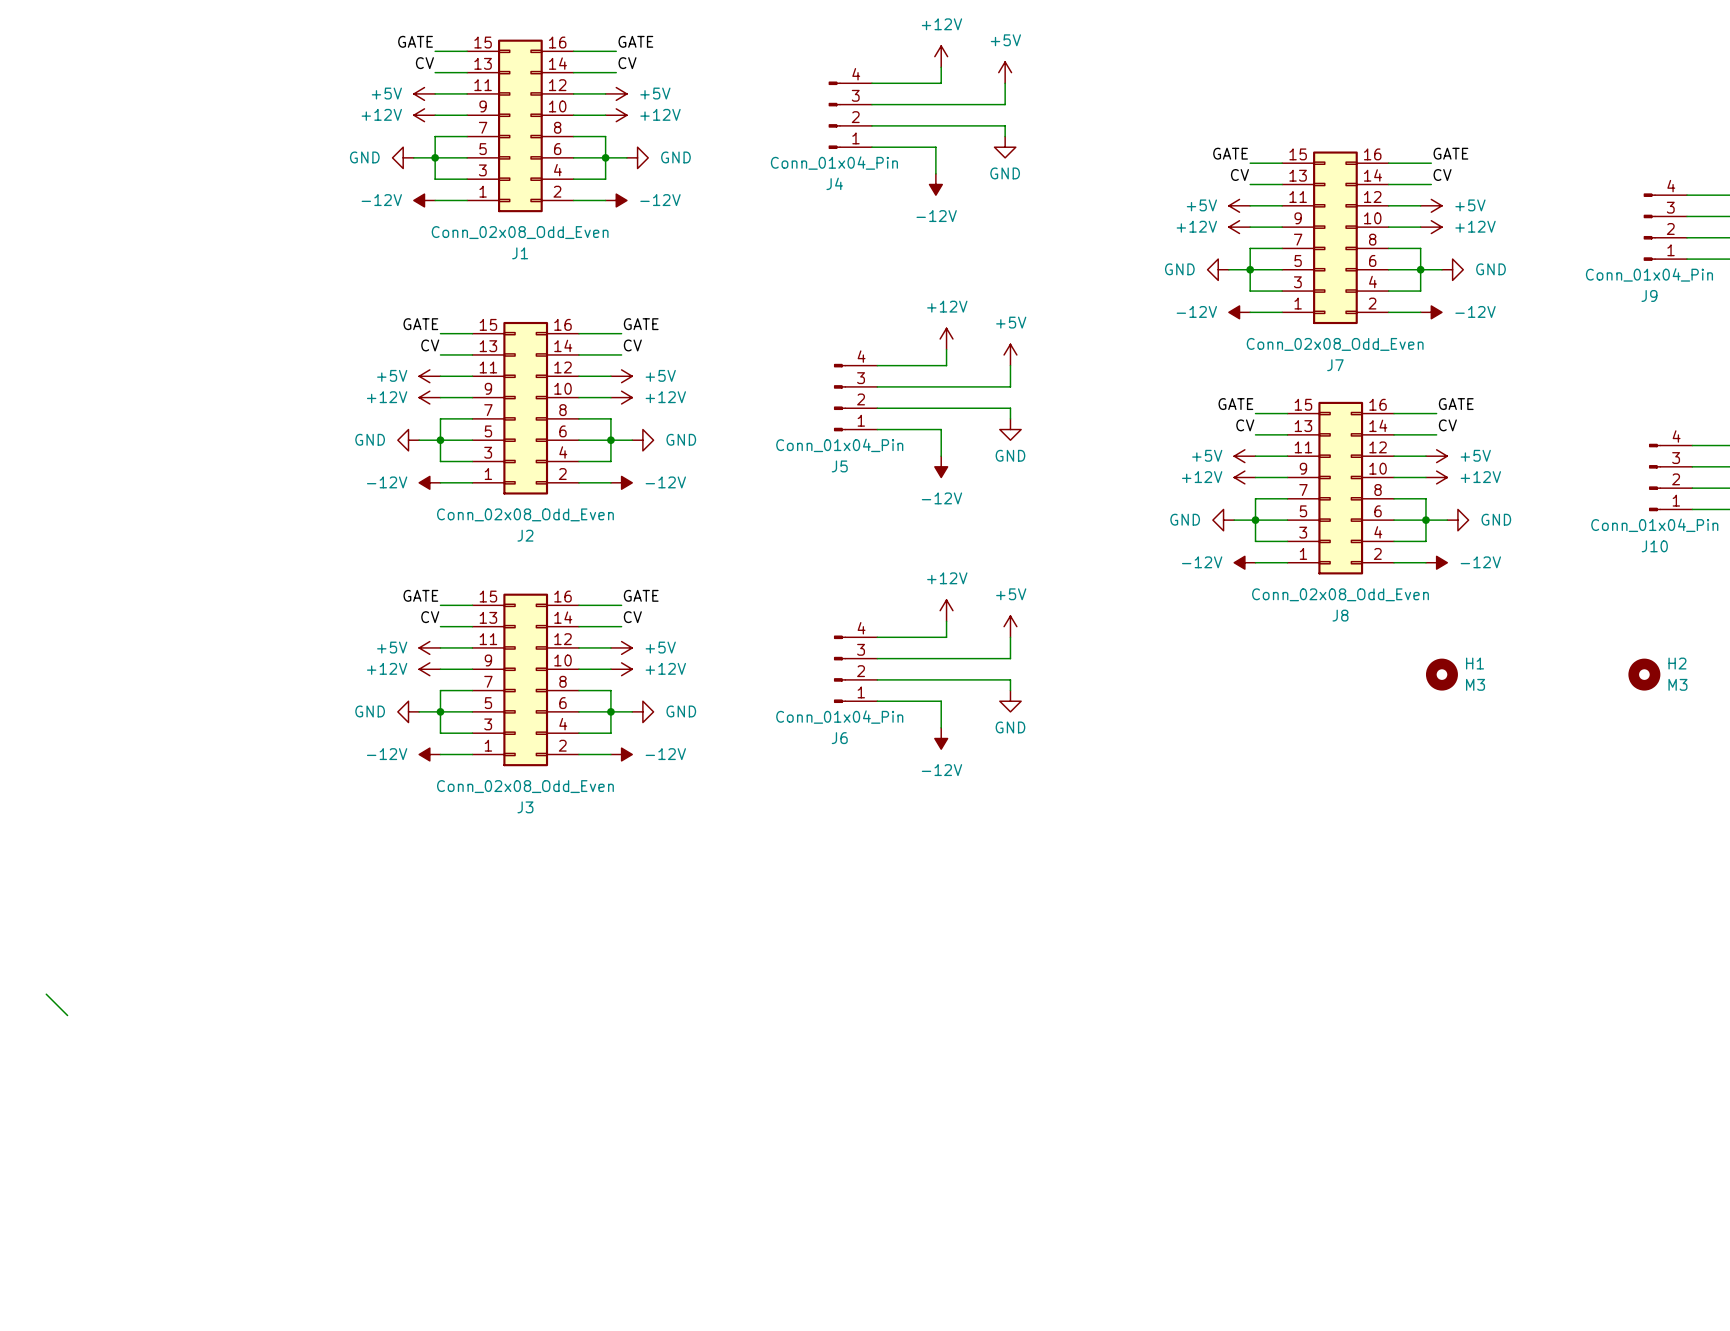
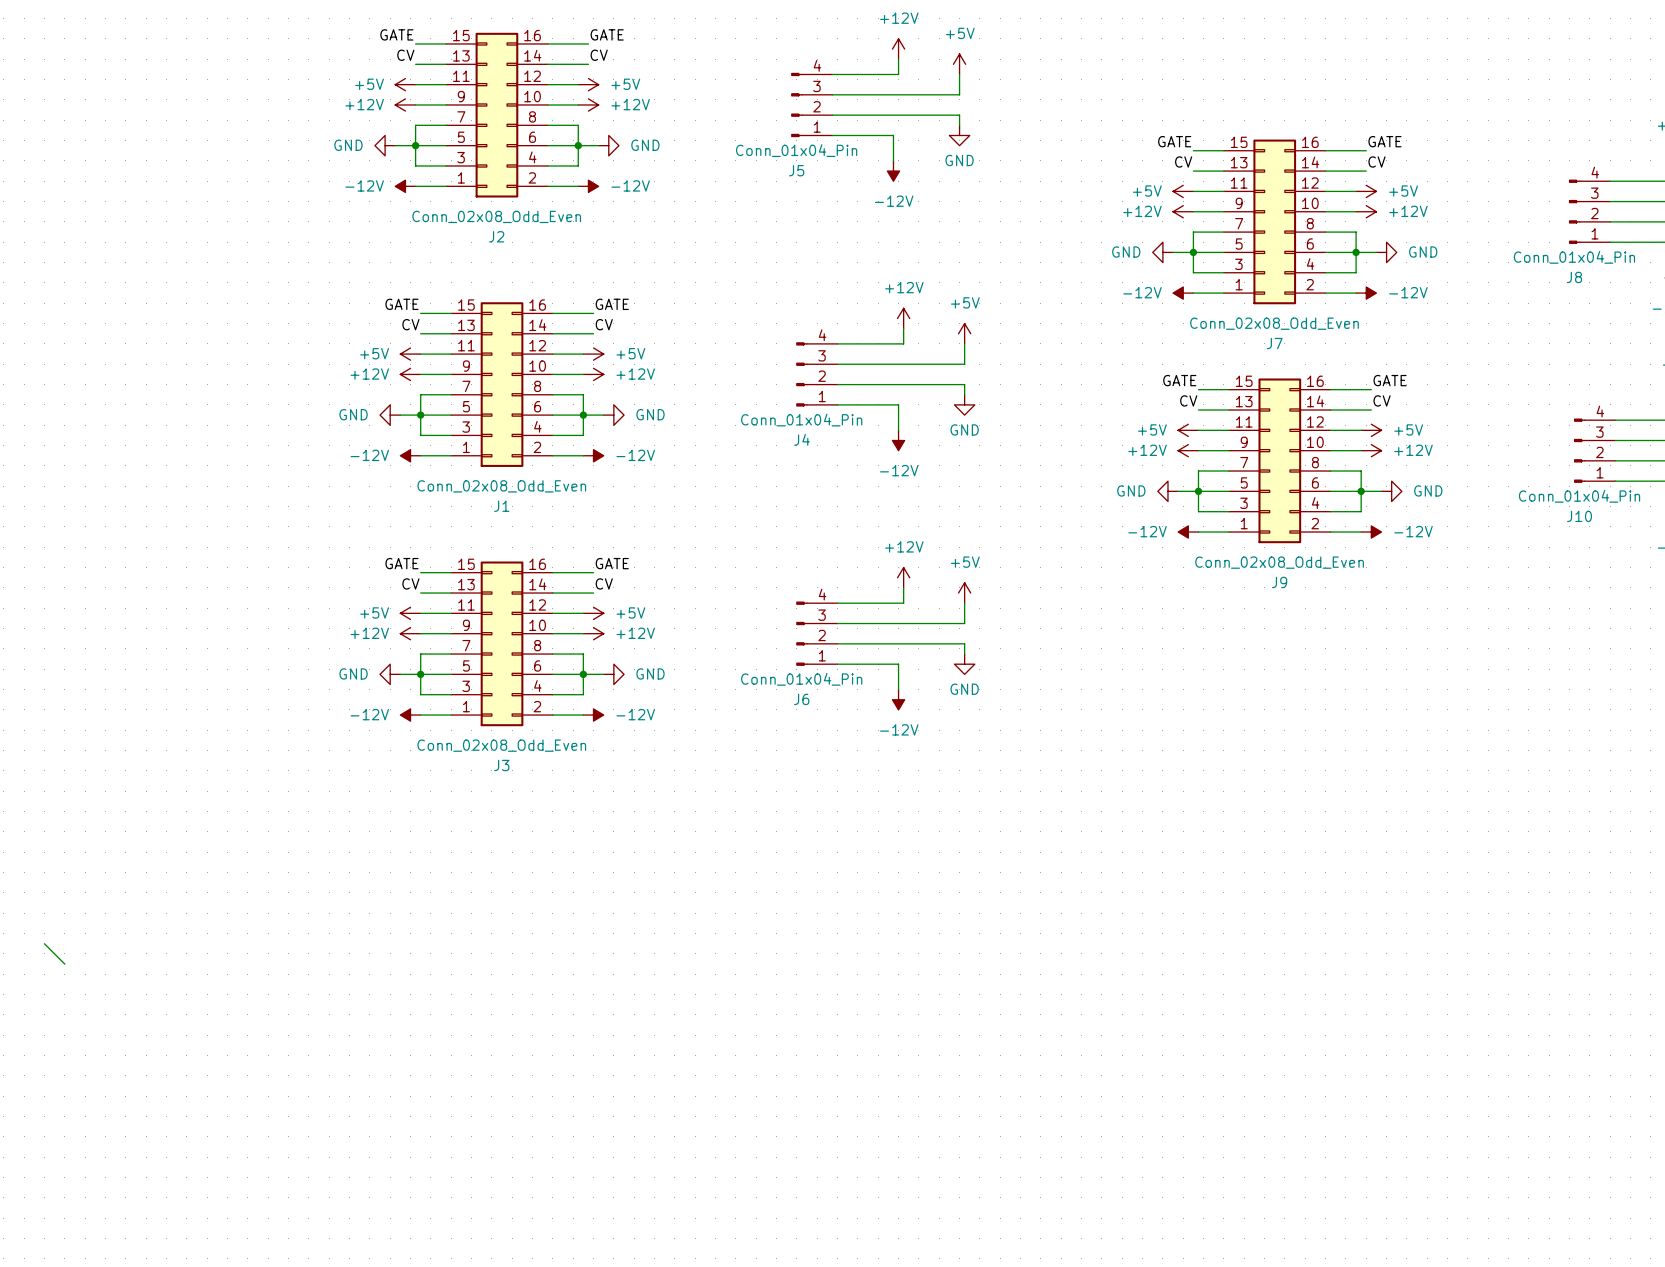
J4 name: J4 (834, 183) -> J5 (796, 170)
J1 name: J1 (520, 253) -> J2 (496, 236)
J9 name: J9 (1649, 295) -> J8 (1574, 277)
J5 name: J5 (839, 466) -> J4 (801, 439)
J2 name: J2 (525, 535) -> J1 (501, 506)
J8 name: J8 (1340, 615) -> J9 (1279, 582)
H1: M3 (1441, 674) -> none
H2: M3 (1644, 674) -> none

